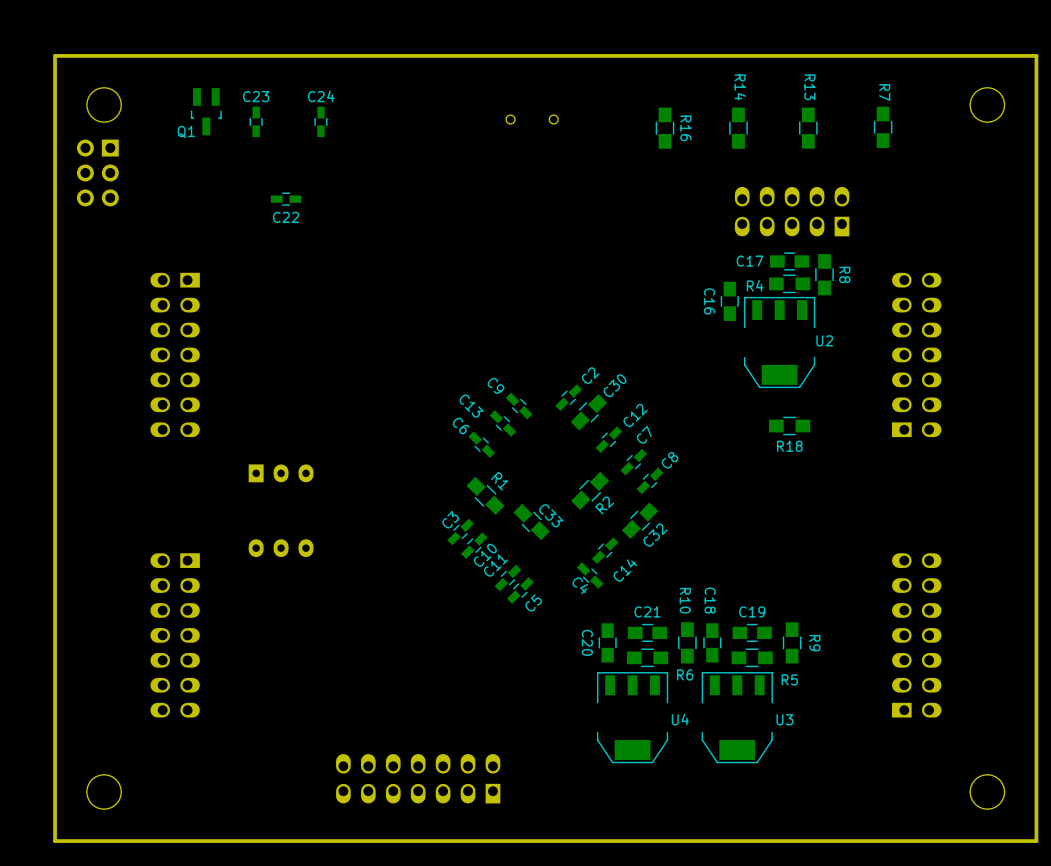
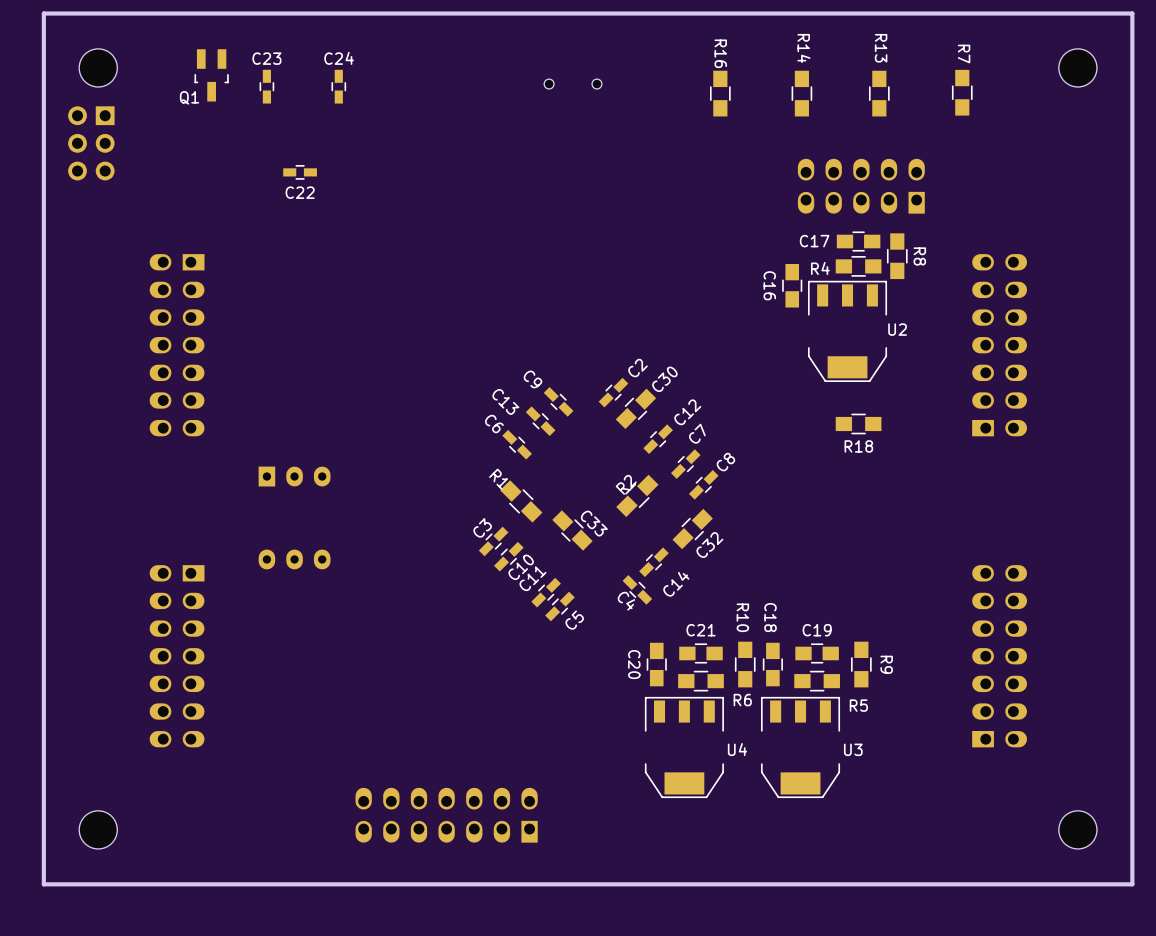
R16 name position: R16 (685, 128) -> R16 (720, 53)
R1 name position: R1 (499, 481) -> R1 (498, 479)
R2 name position: R2 (604, 505) -> R2 (626, 484)

